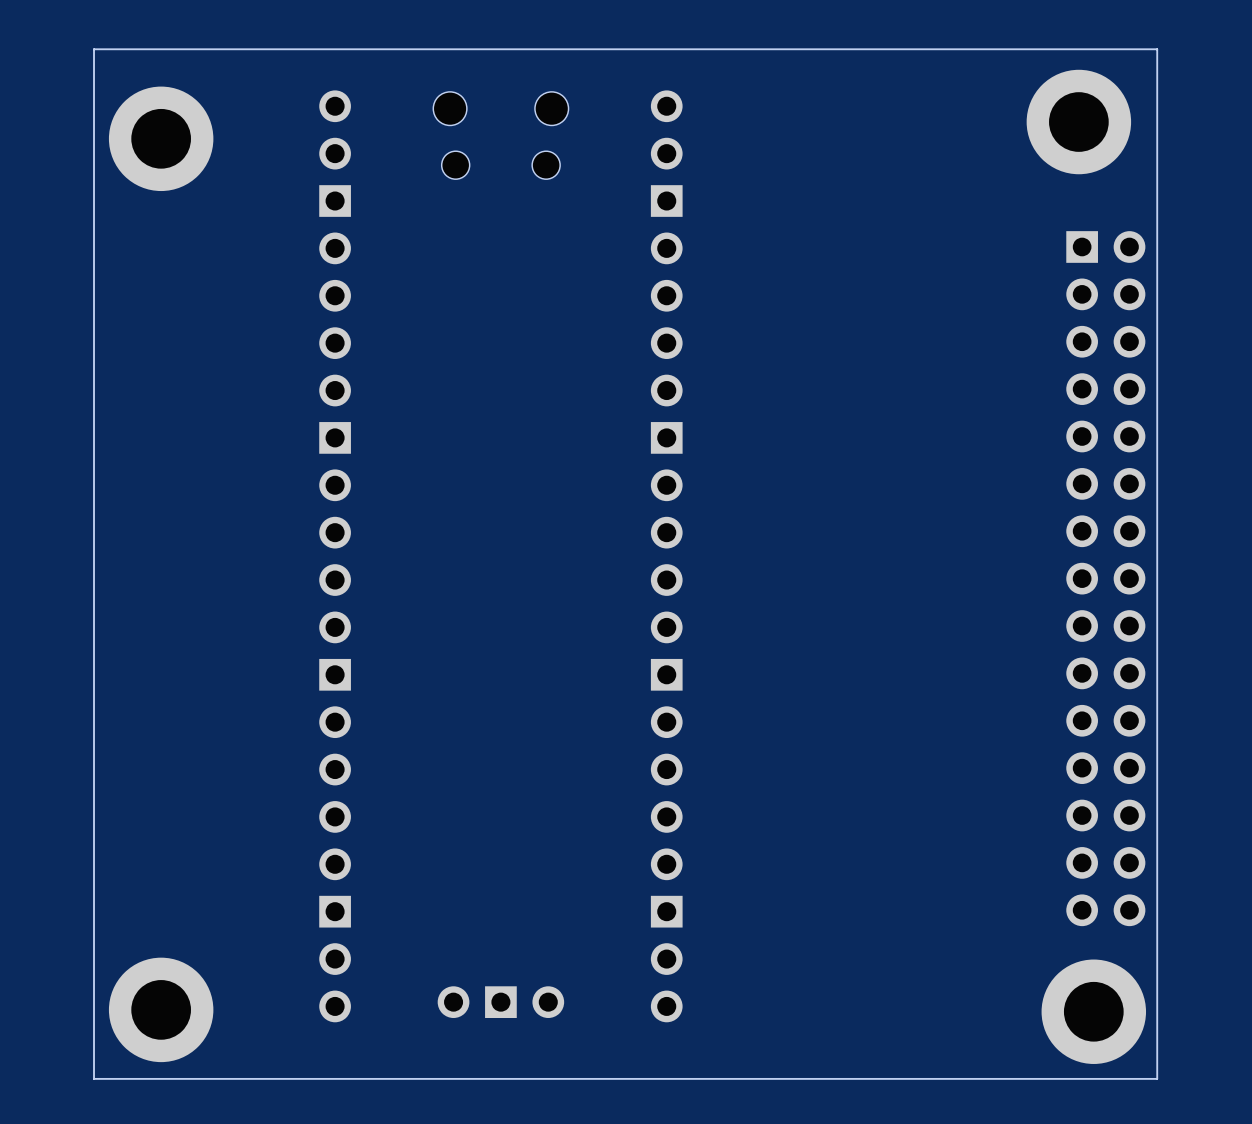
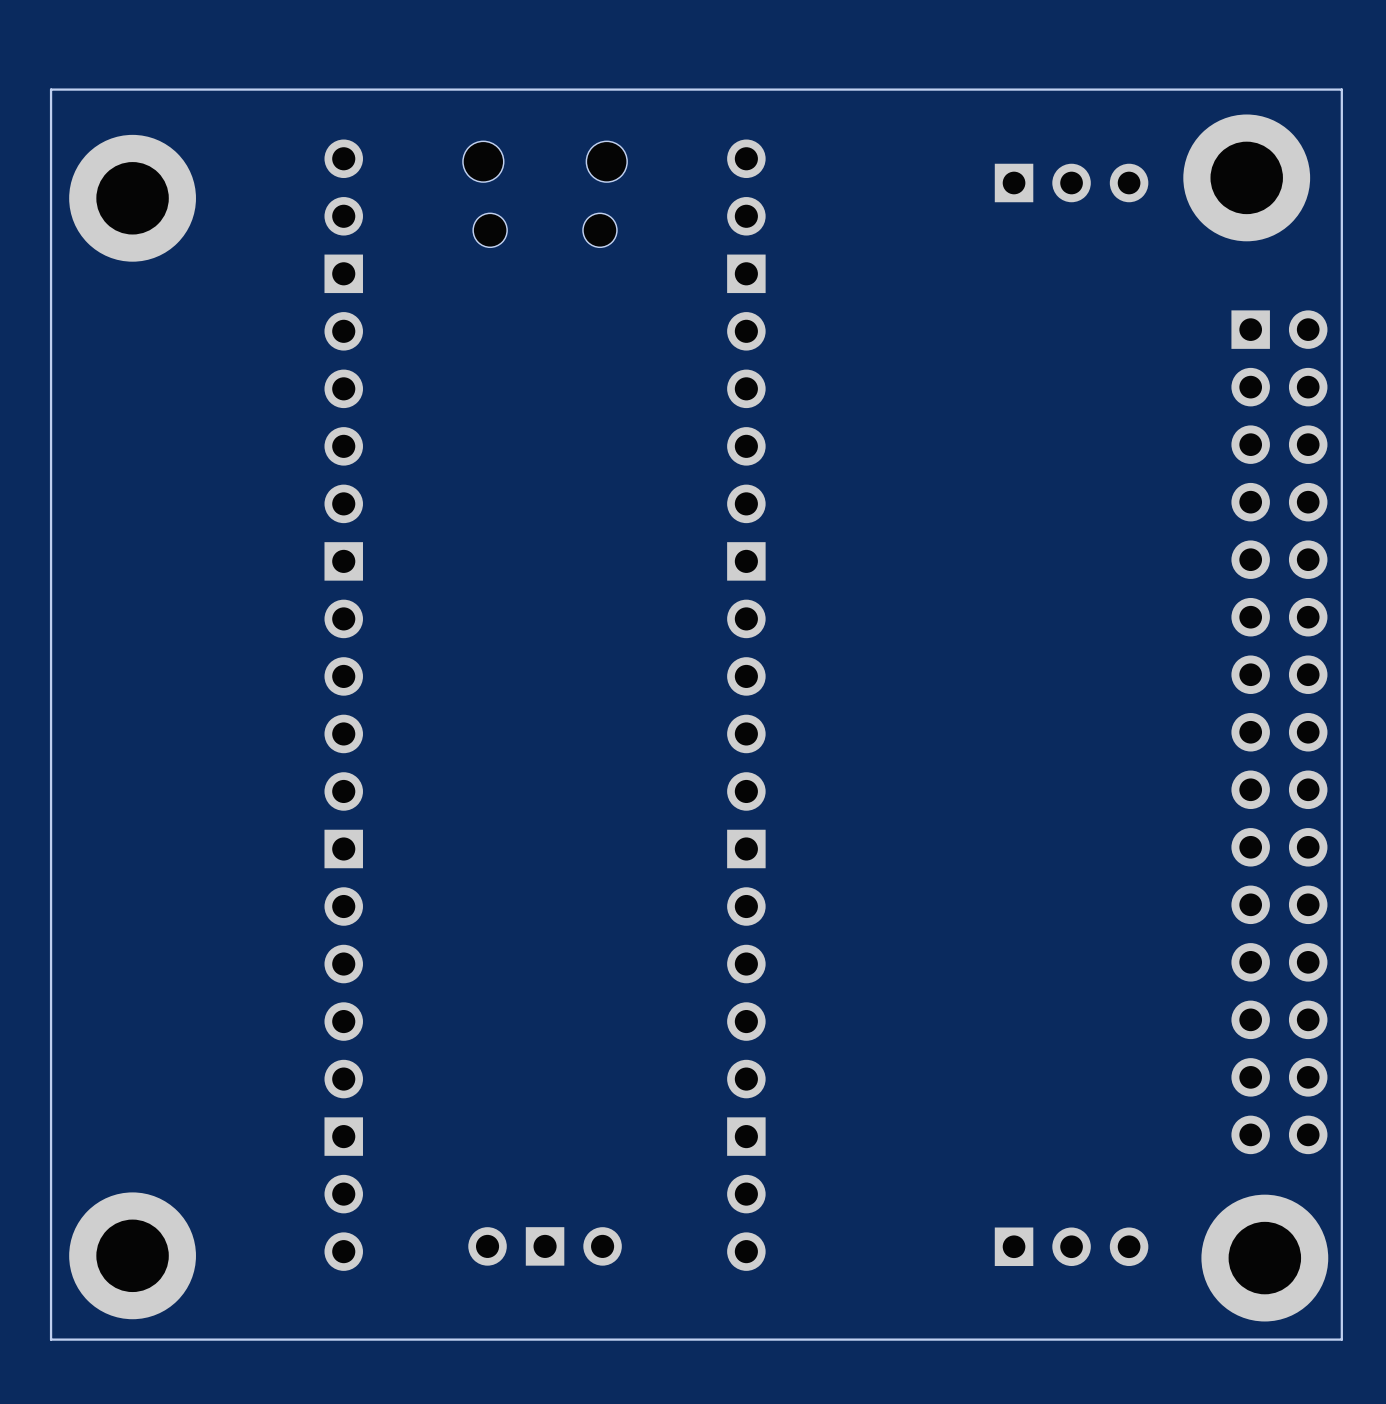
part: none -> (1071, 182)
part: none -> (1071, 1246)

